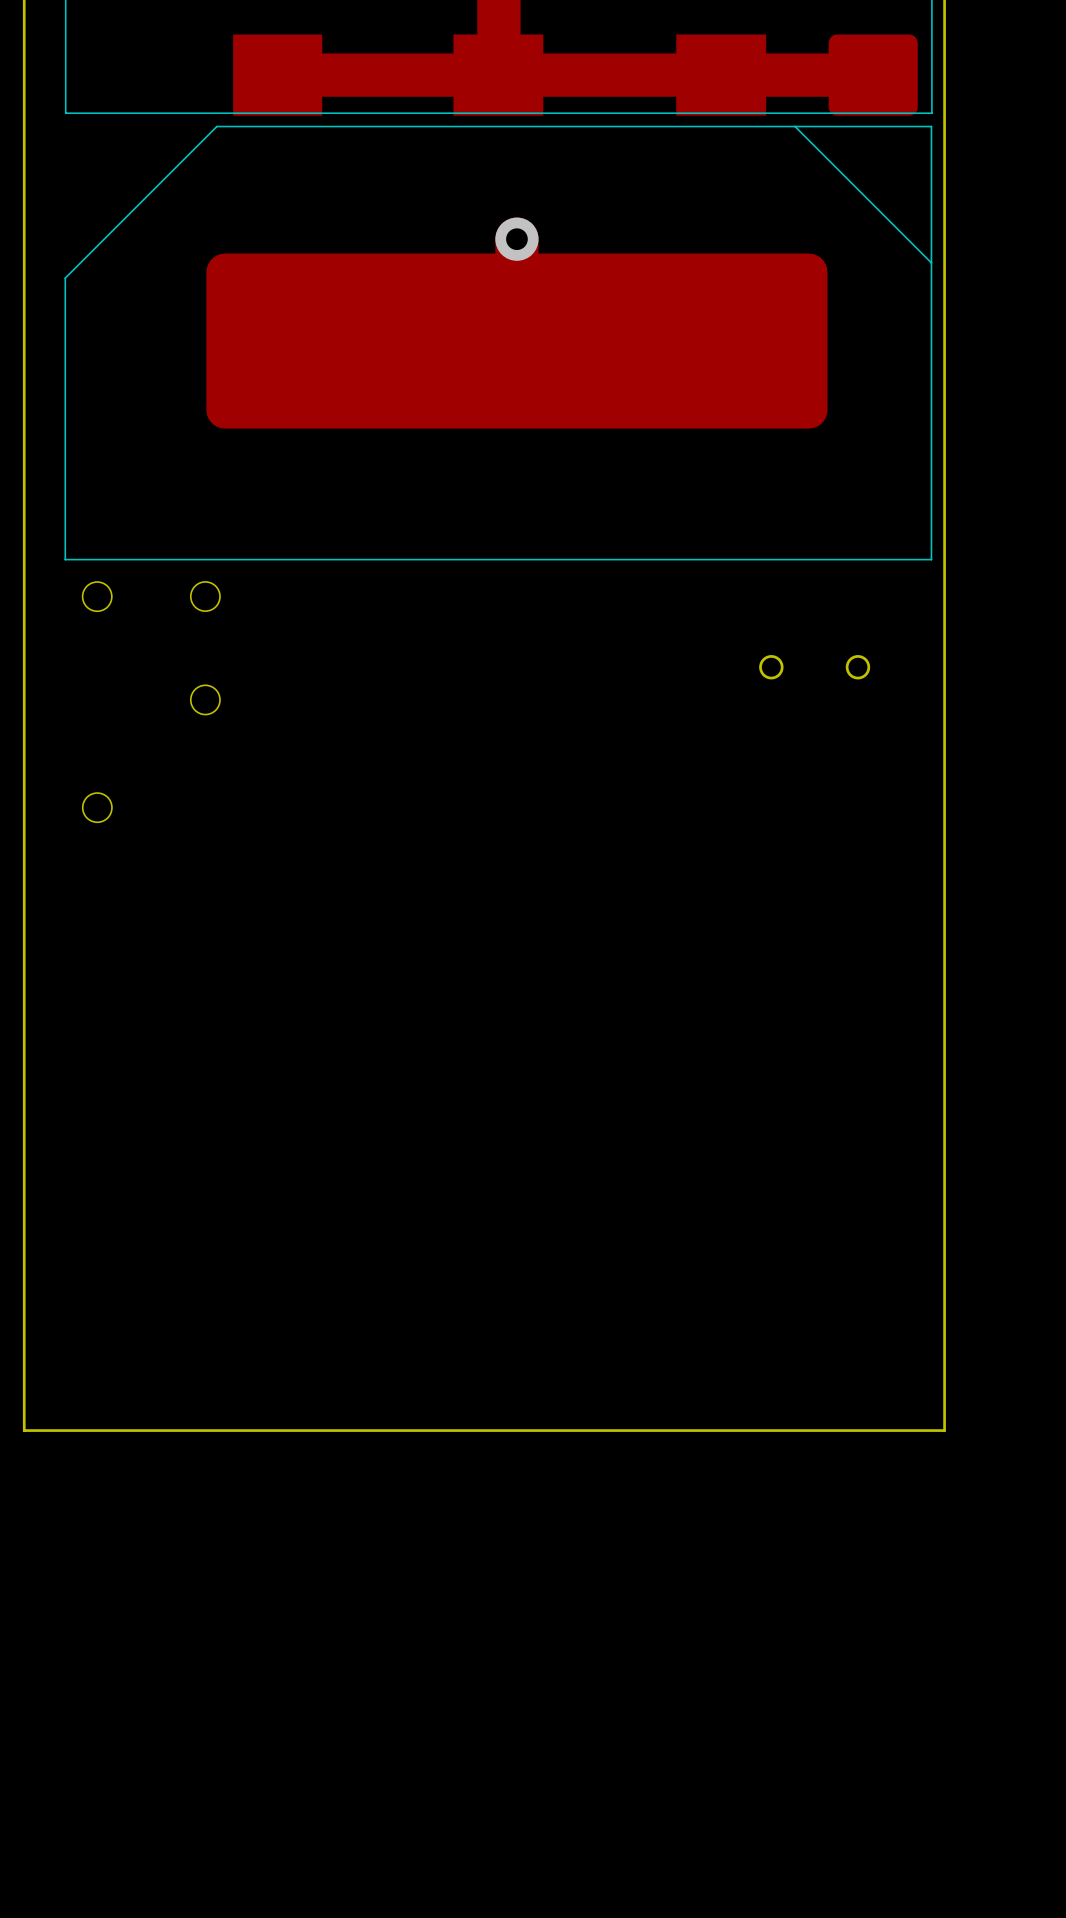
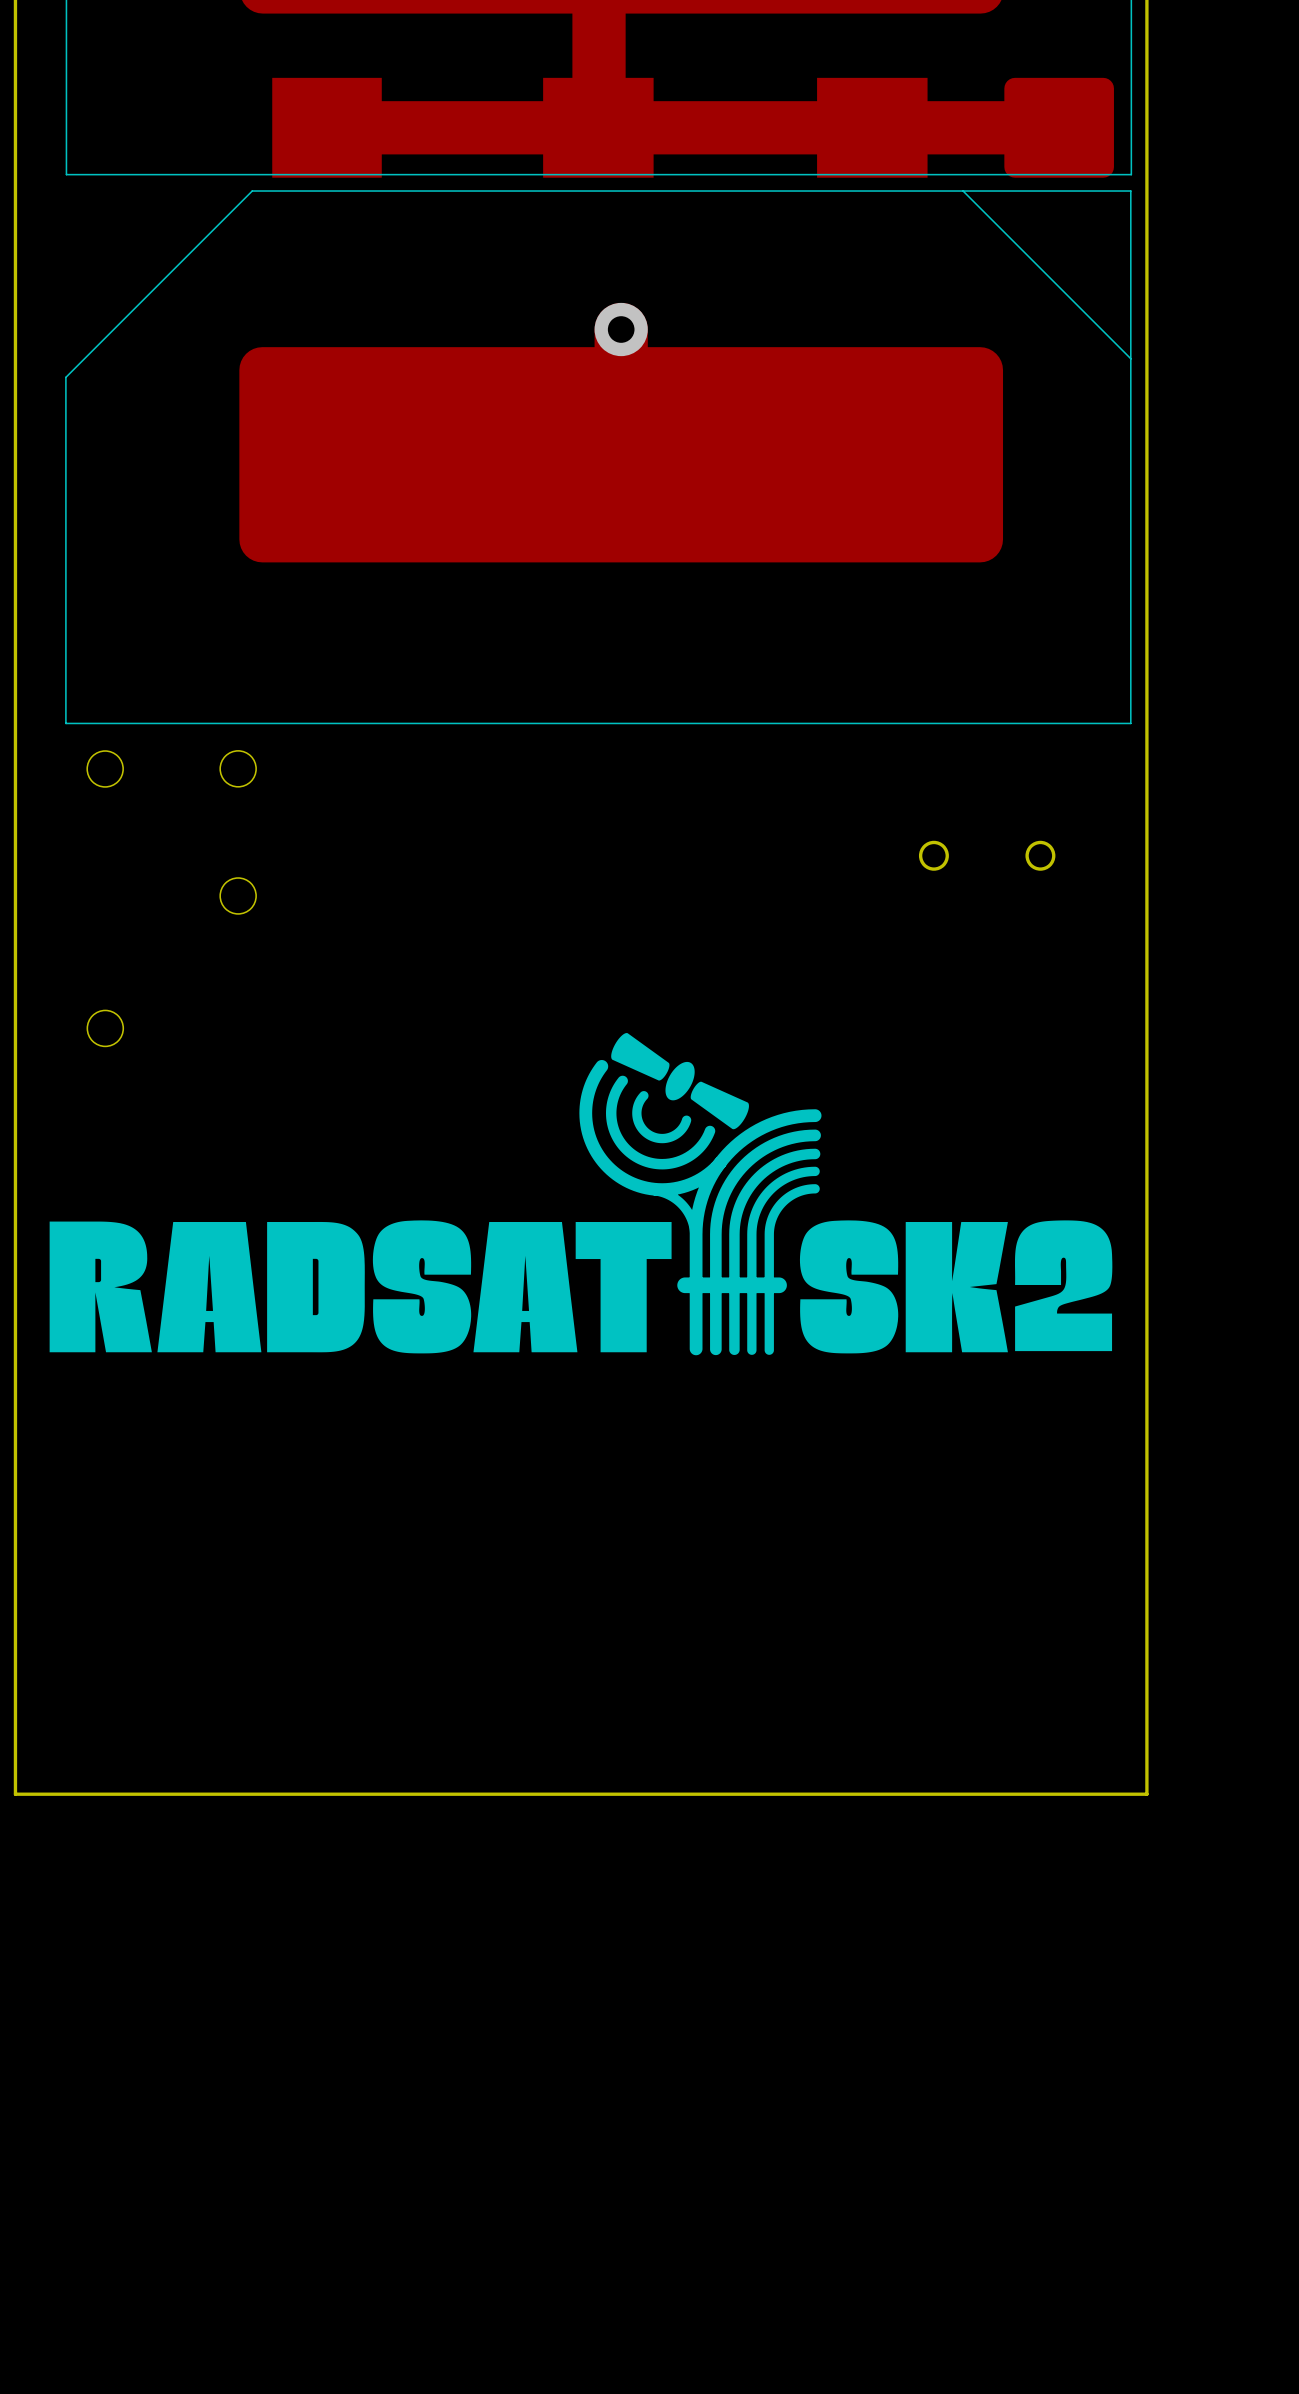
drawing: none -> [49, 1033, 1113, 1356]

